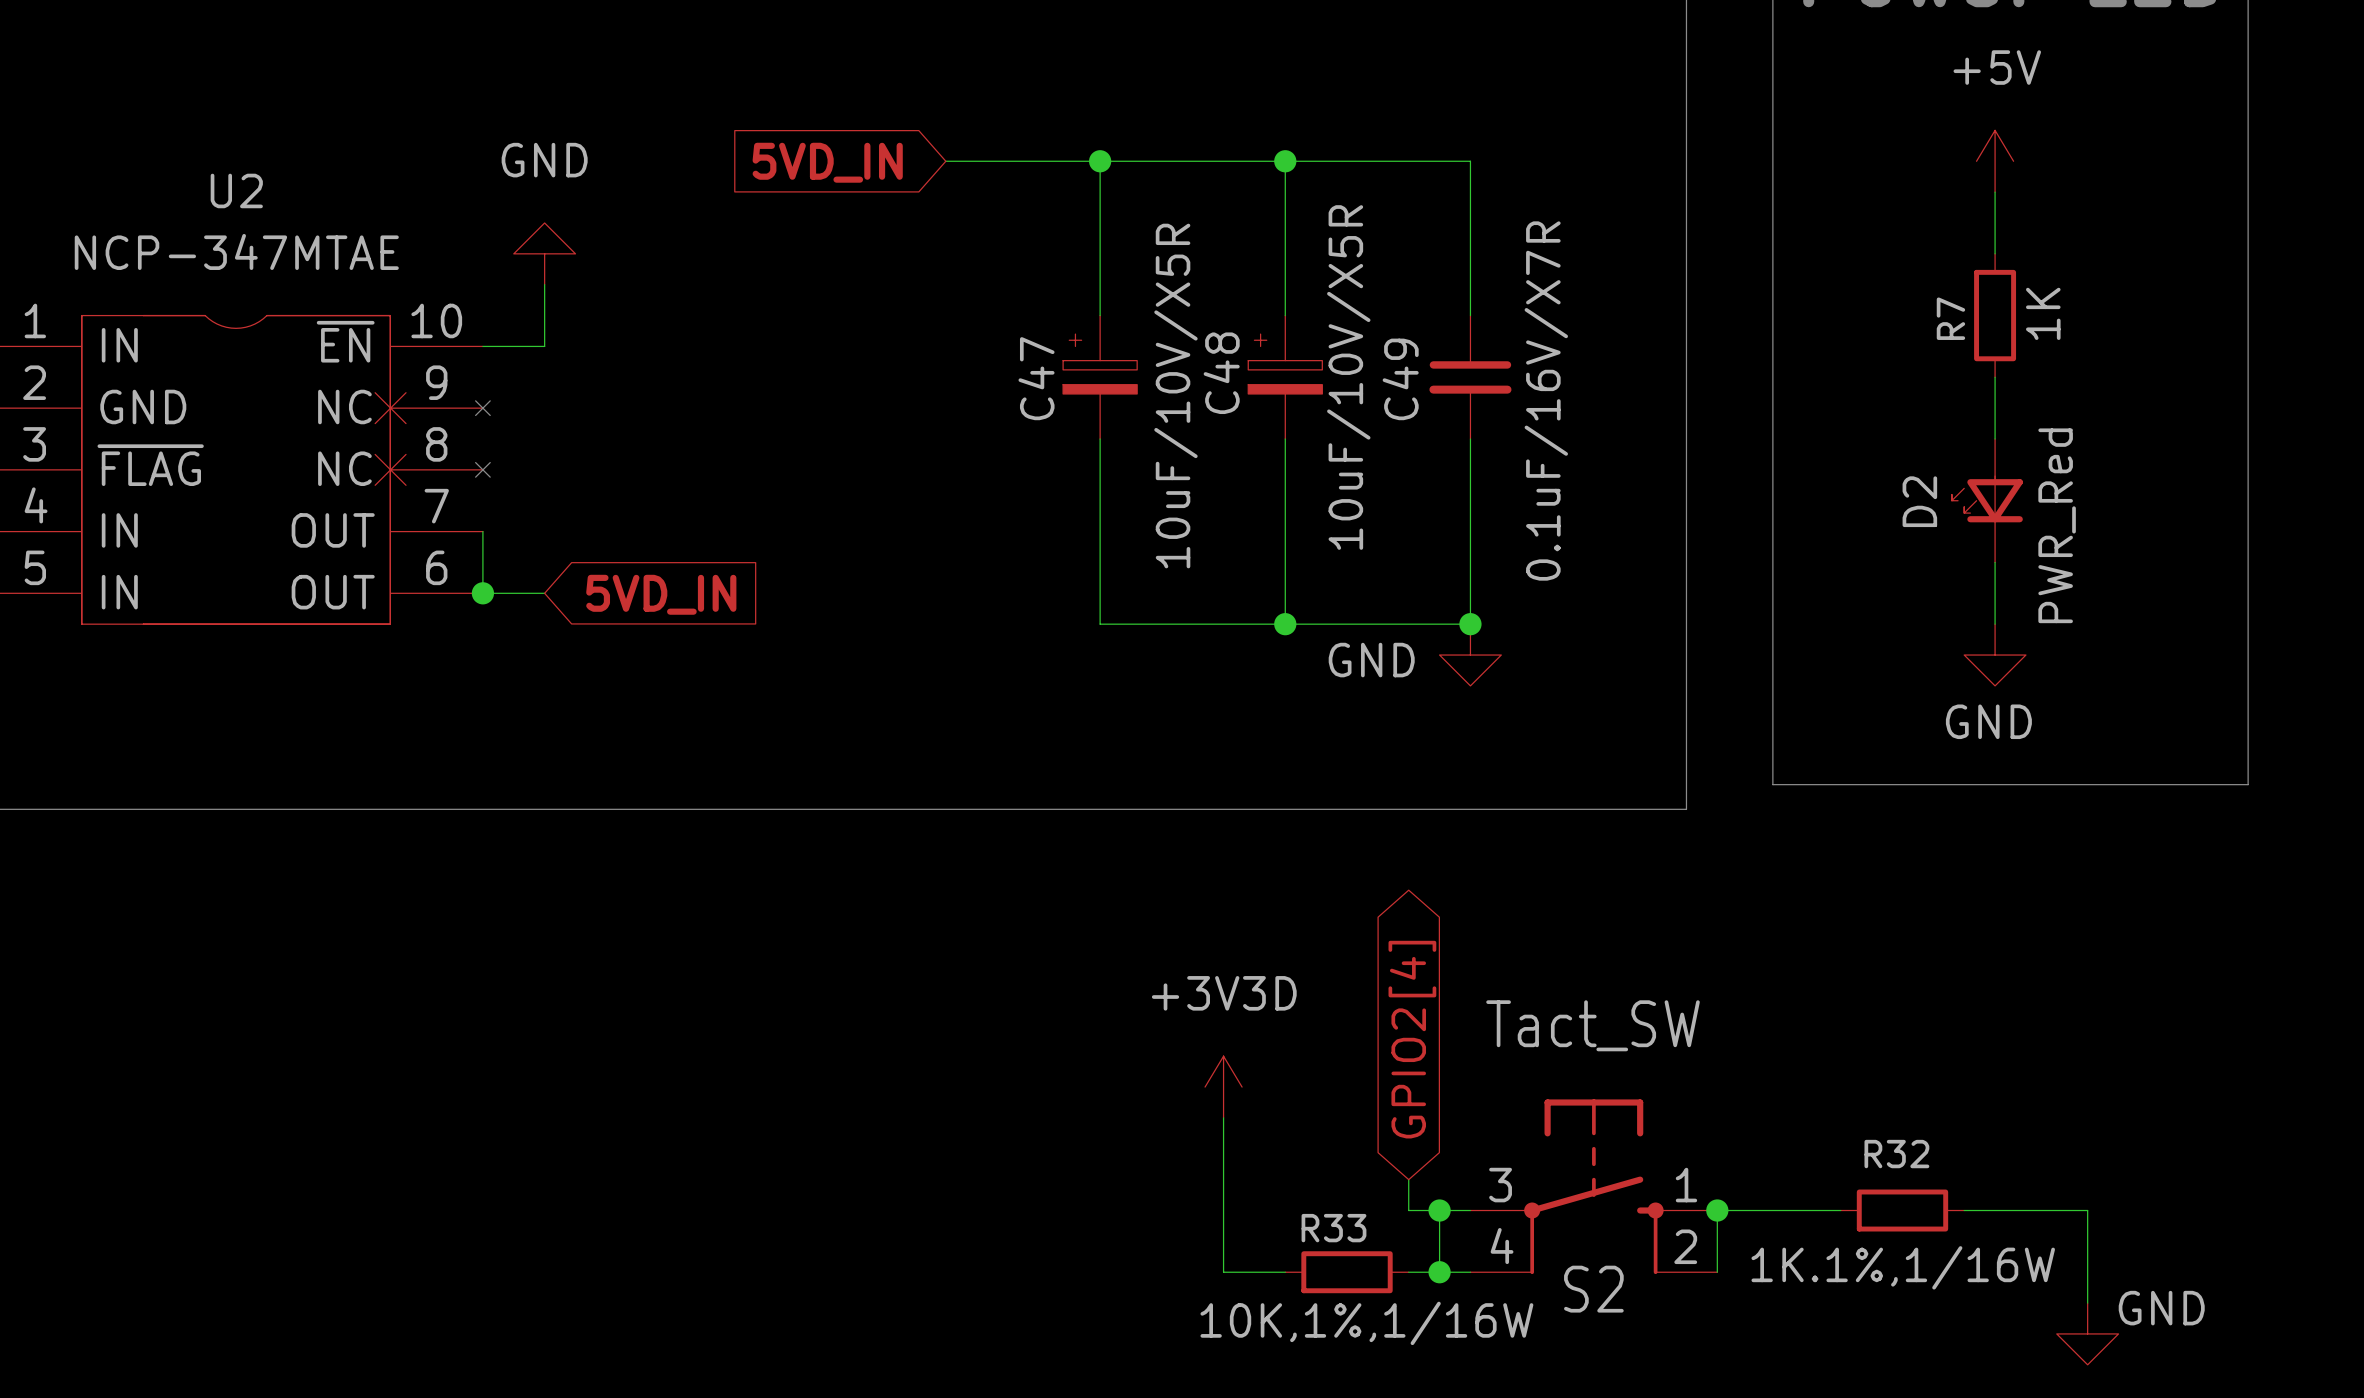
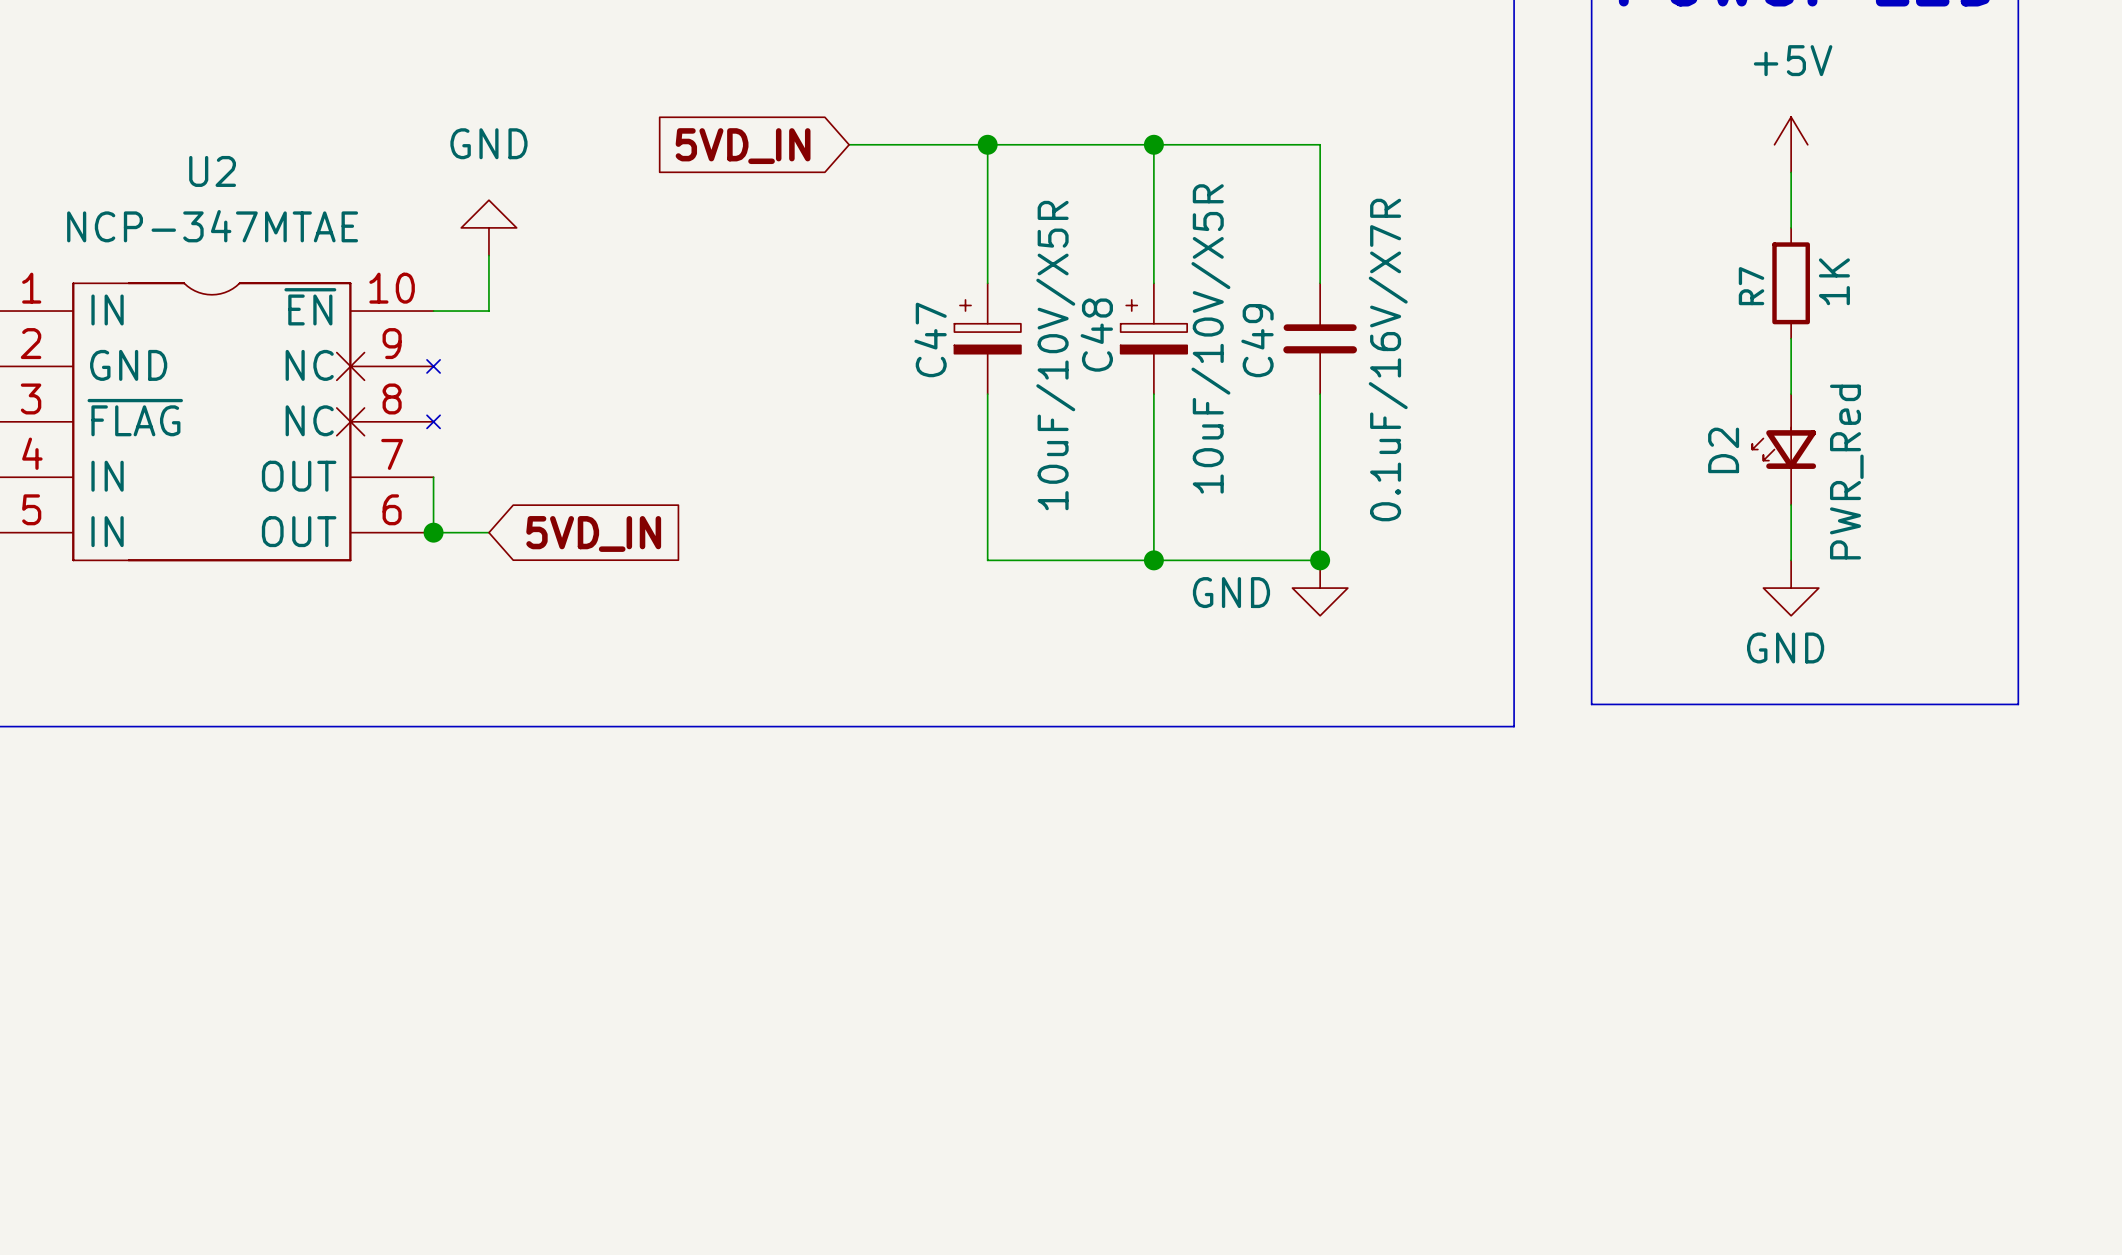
global label: GPIO2[4] (1412, 1039) -> none
power symbol: +3V3D (1223, 1087) -> none
wire: (1223, 1117) (1223, 1272) (1285, 1272) -> none
wire: (1408, 1179) (1408, 1210) (1470, 1210) -> none
S2: Tact_SW (1593, 1186) -> none
wire: (1439, 1210) (1439, 1272) -> none
junction: (1439, 1210) -> none
junction: (1717, 1210) -> none
wire: (1840, 1210) (1717, 1210) (1717, 1272) -> none
R32: 1K.1%,1/16W (1902, 1210) -> none
wire: (1964, 1210) (2087, 1210) (2087, 1303) -> none
R33: 10K,1%,1/16W (1347, 1272) -> none
wire: (1408, 1272) (1470, 1272) -> none
junction: (1439, 1272) -> none
power symbol: GND (2087, 1333) -> none

